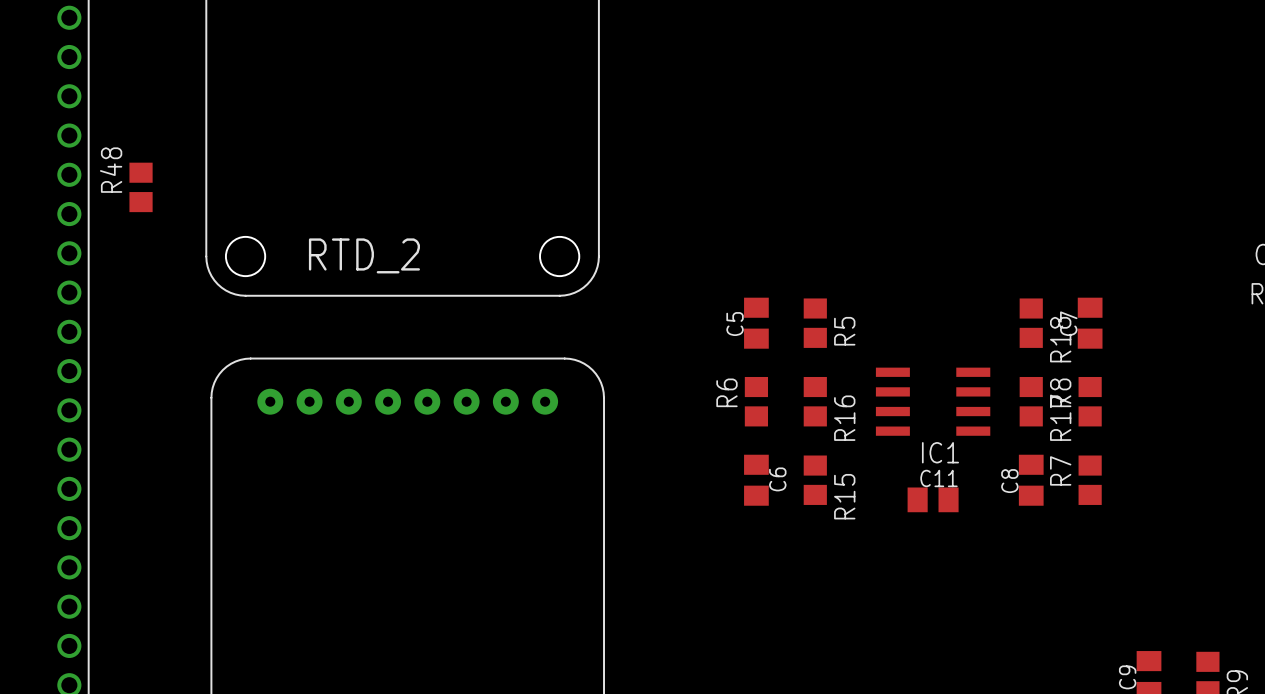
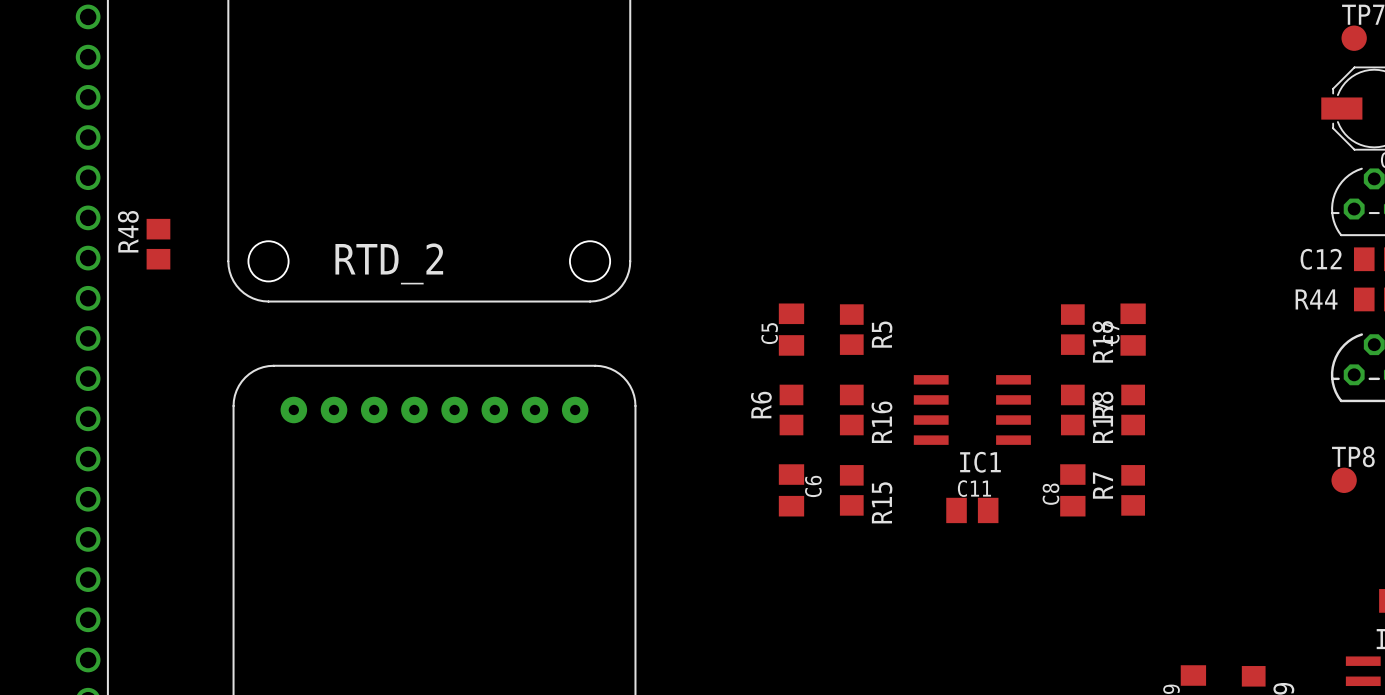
R48 position: (141, 187) -> (158, 244)

